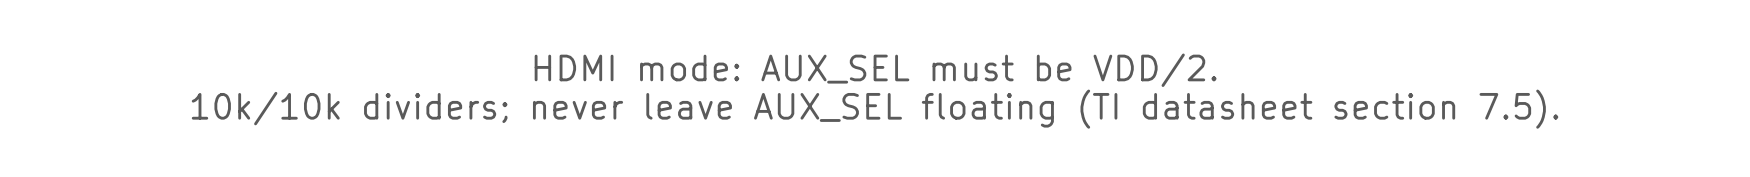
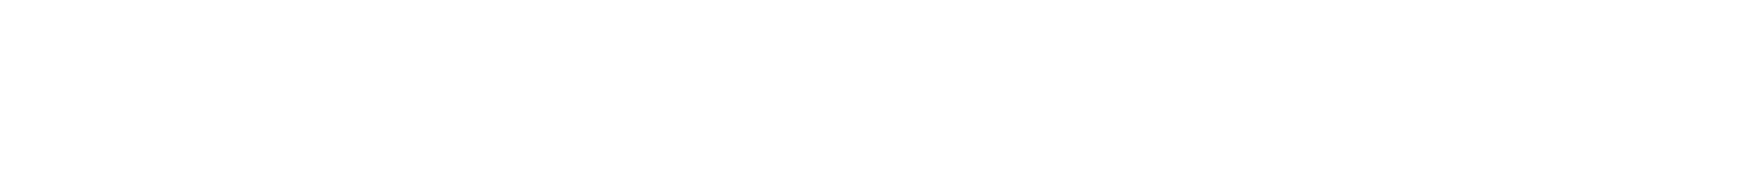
text: HDMI mode: AUX_SEL must be VDD/2. (875, 70) -> none
text: 10k/10k dividers; never leave AUX_SEL floating (TI datasheet section 7.5). (875, 109) -> none

